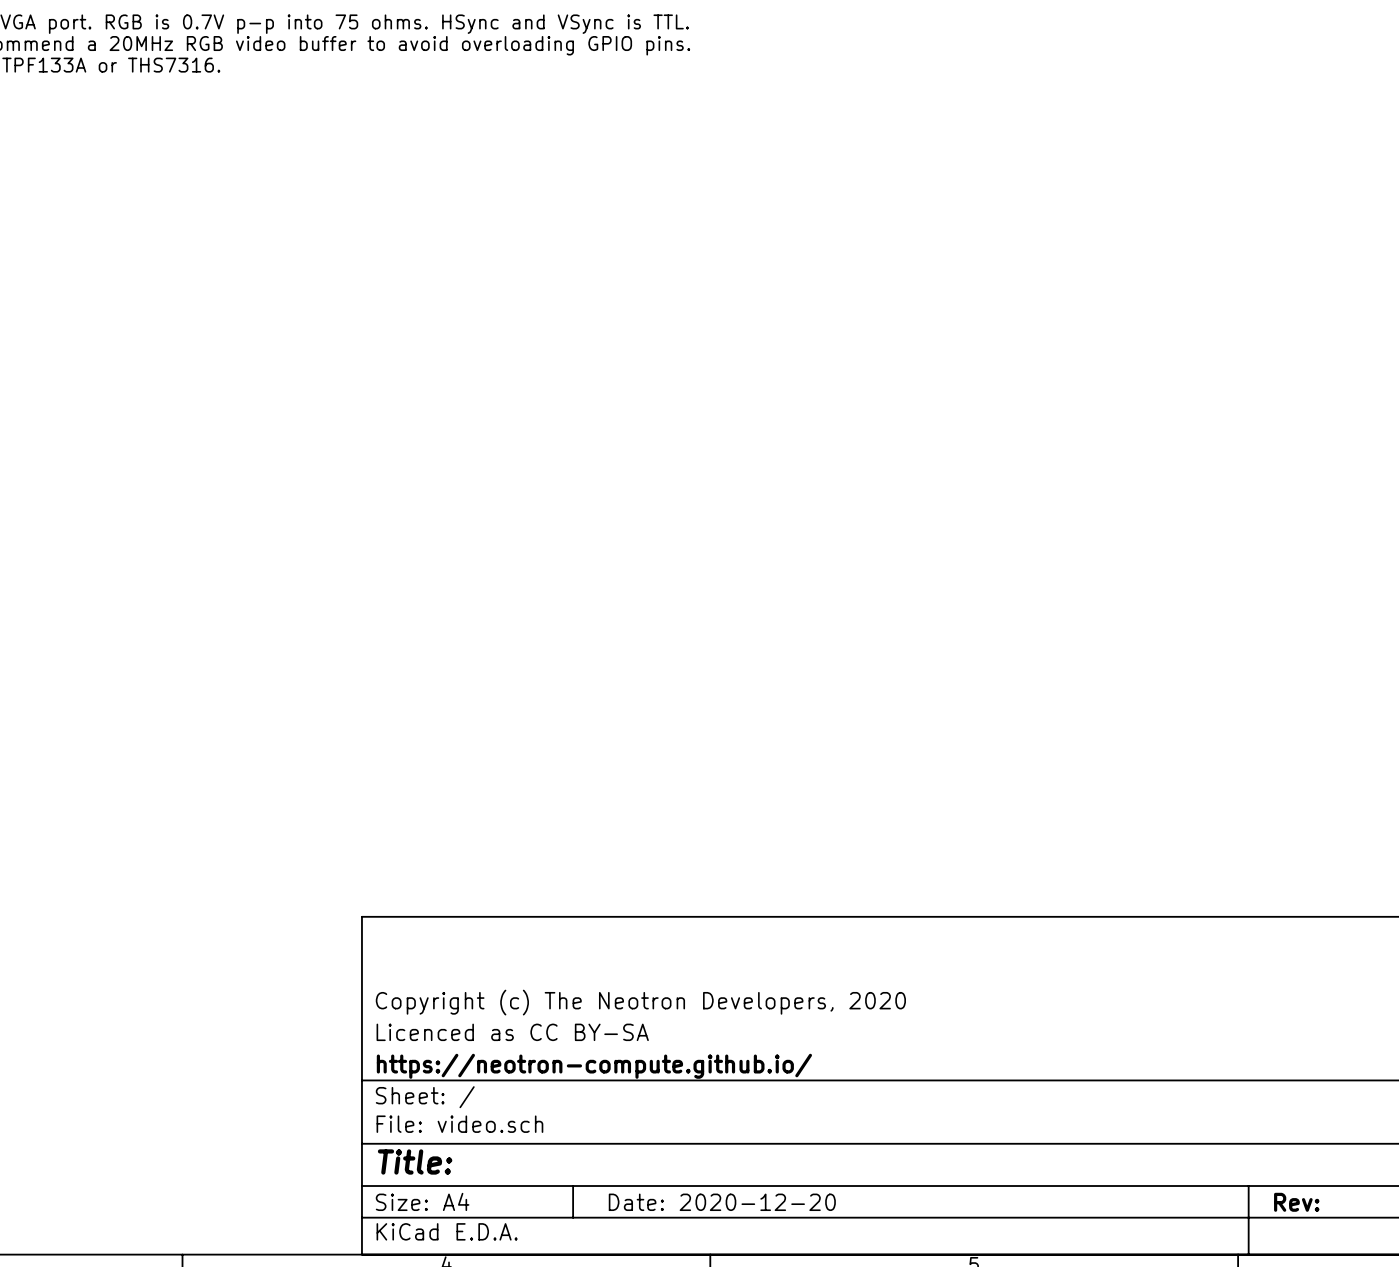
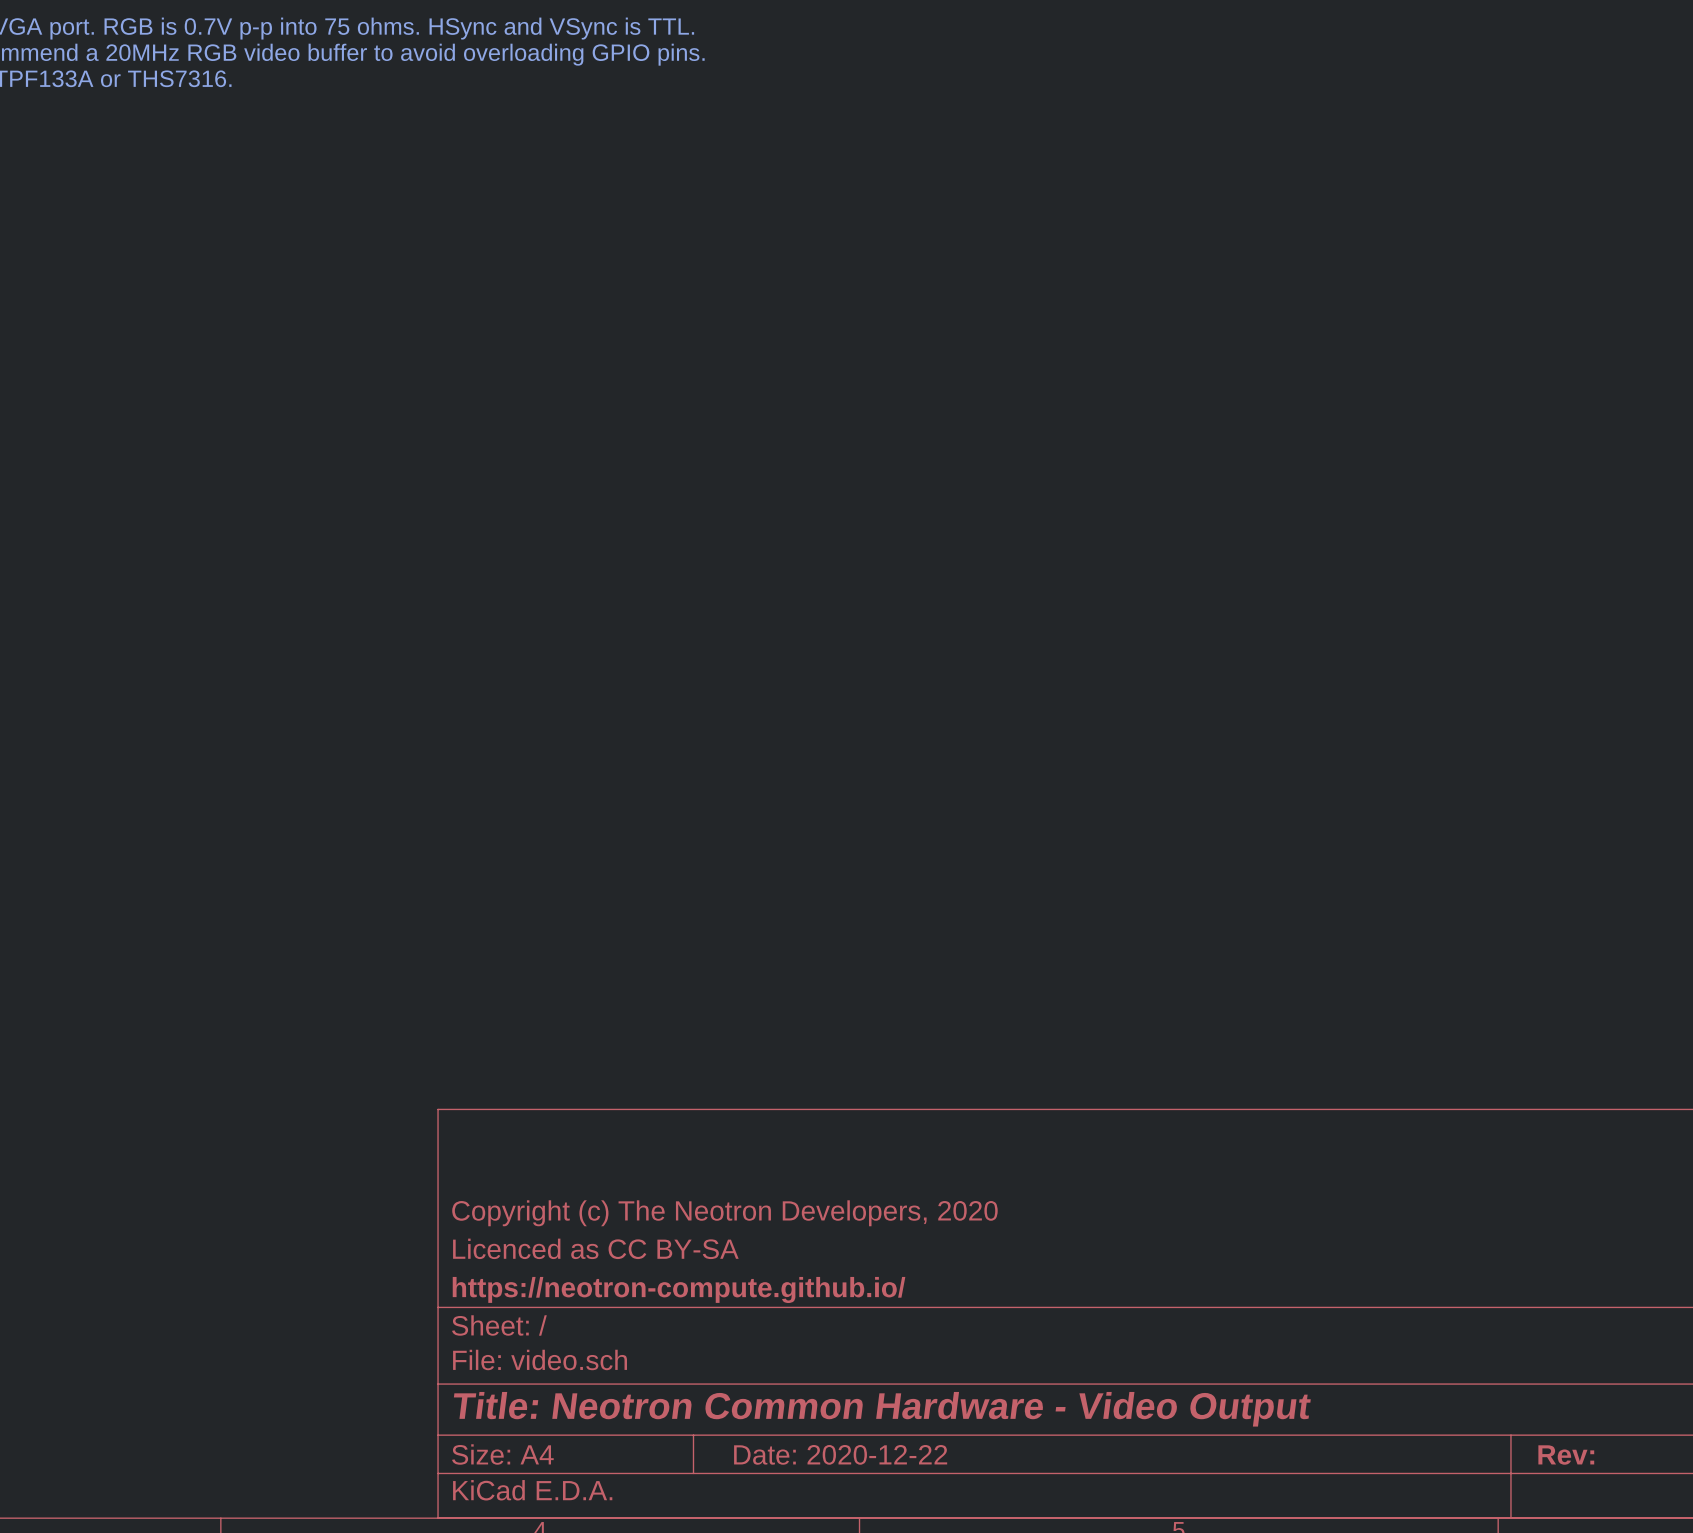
title block: Title: (415, 1161) -> Title: Neotron Common Hardware - Video Output (882, 1409)
title block: Date: 2020-12-20 (722, 1202) -> Date: 2020-12-22 (840, 1454)

